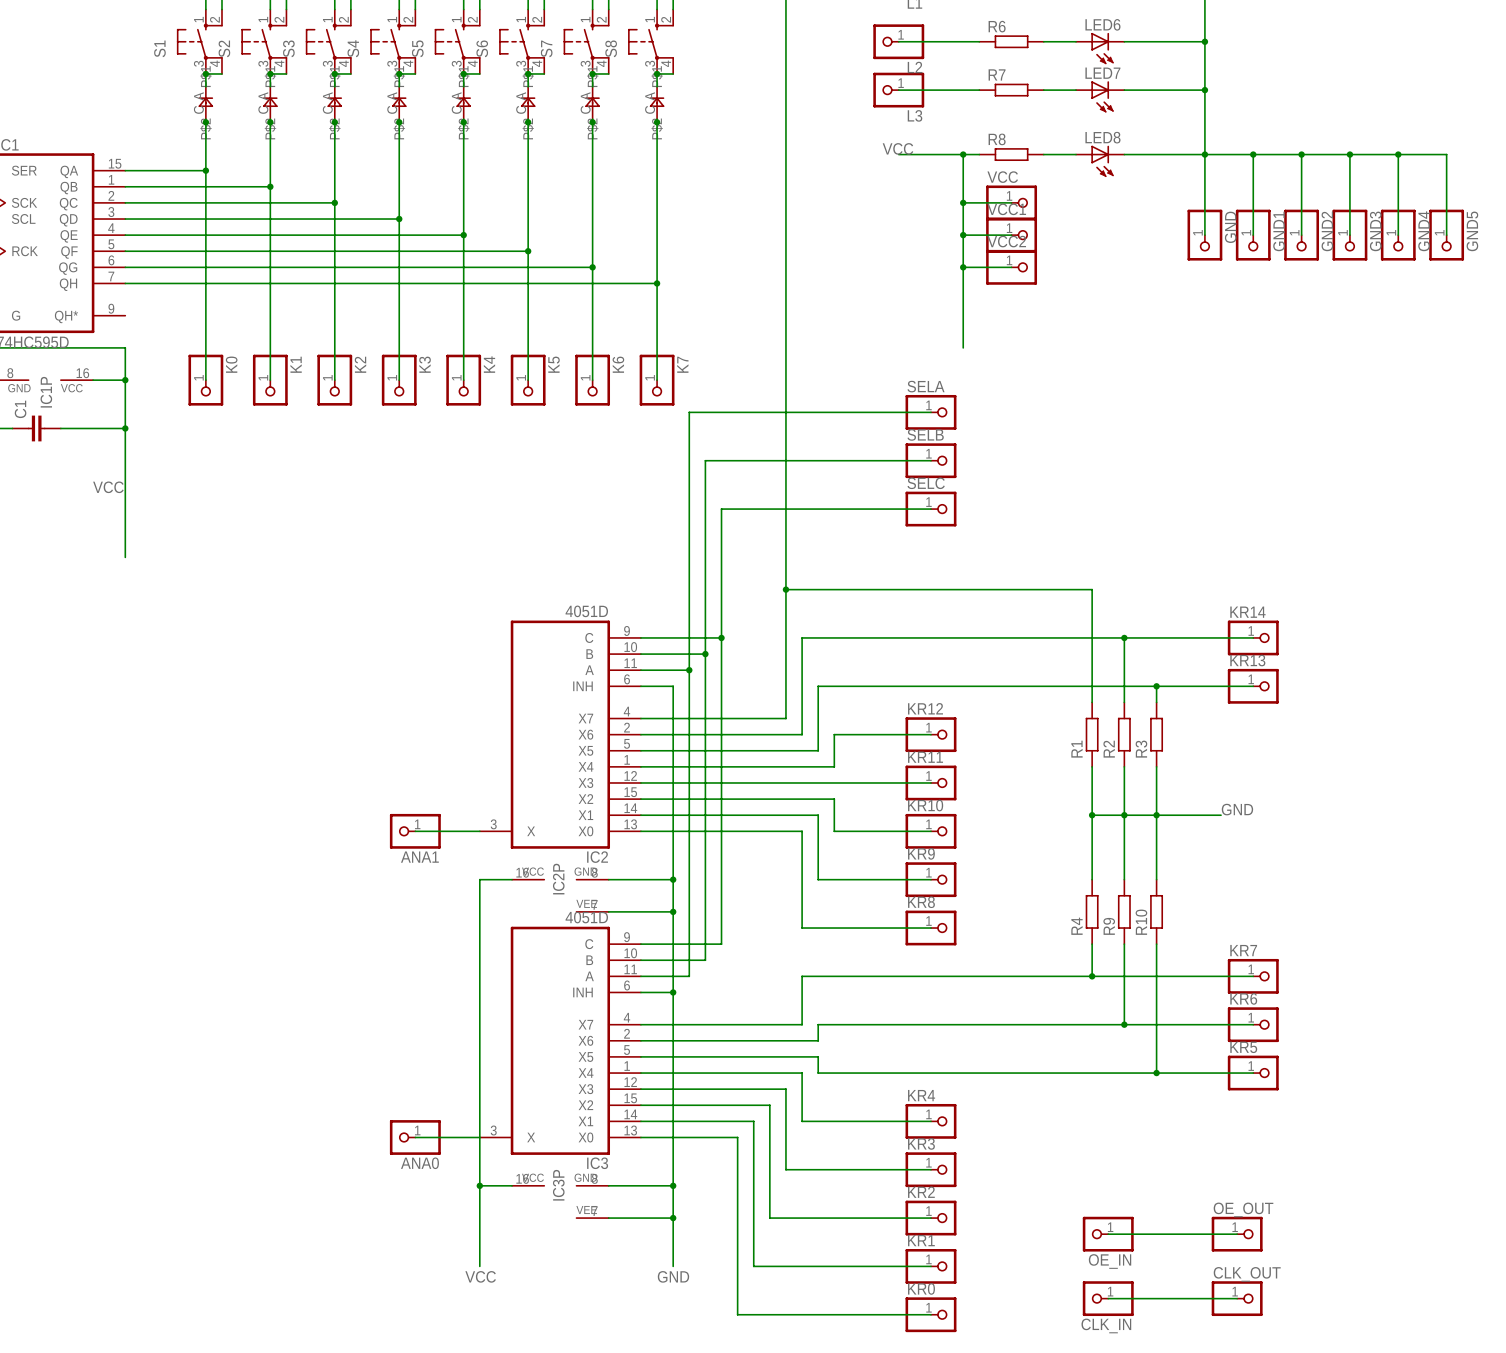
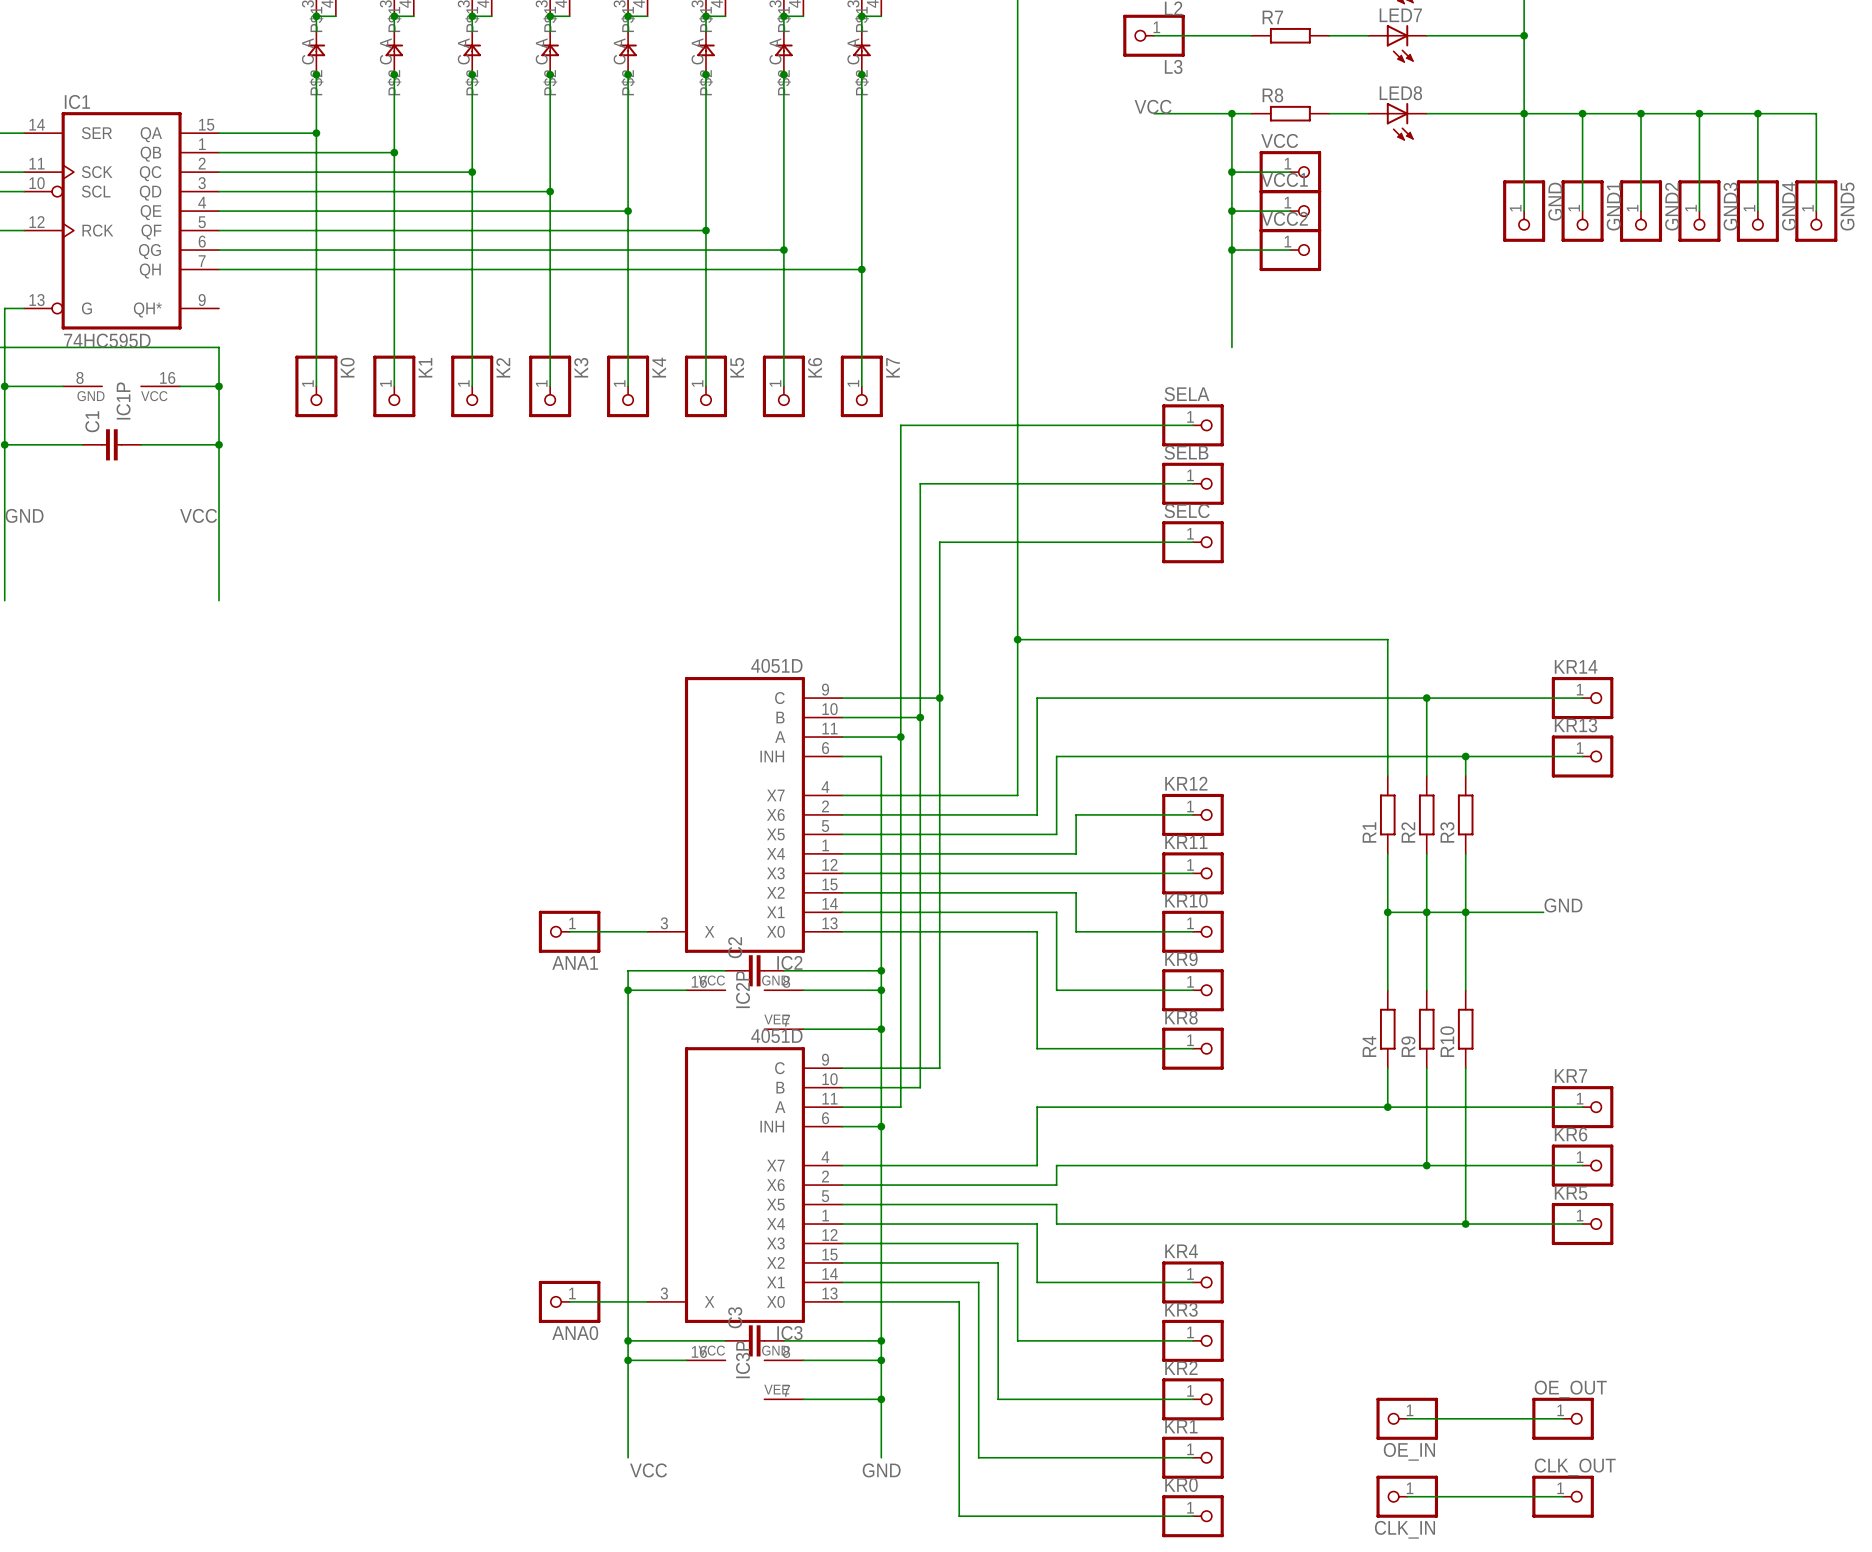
wire: none -> (725, 970) (628, 970) (628, 1457)
C2: none -> (754, 970)
wire: none -> (783, 970) (881, 970)
junction: none -> (881, 970)
junction: none -> (628, 990)
wire: (479, 879) (479, 1266) -> (647, 990) (628, 990)
wire: none -> (628, 1340) (725, 1340)
junction: none -> (628, 1340)
C3: none -> (754, 1340)
wire: none -> (783, 1340) (881, 1340)
junction: none -> (881, 1340)
wire: none -> (628, 1360) (647, 1360)
junction: none -> (628, 1360)
junction: (479, 1185) -> none

